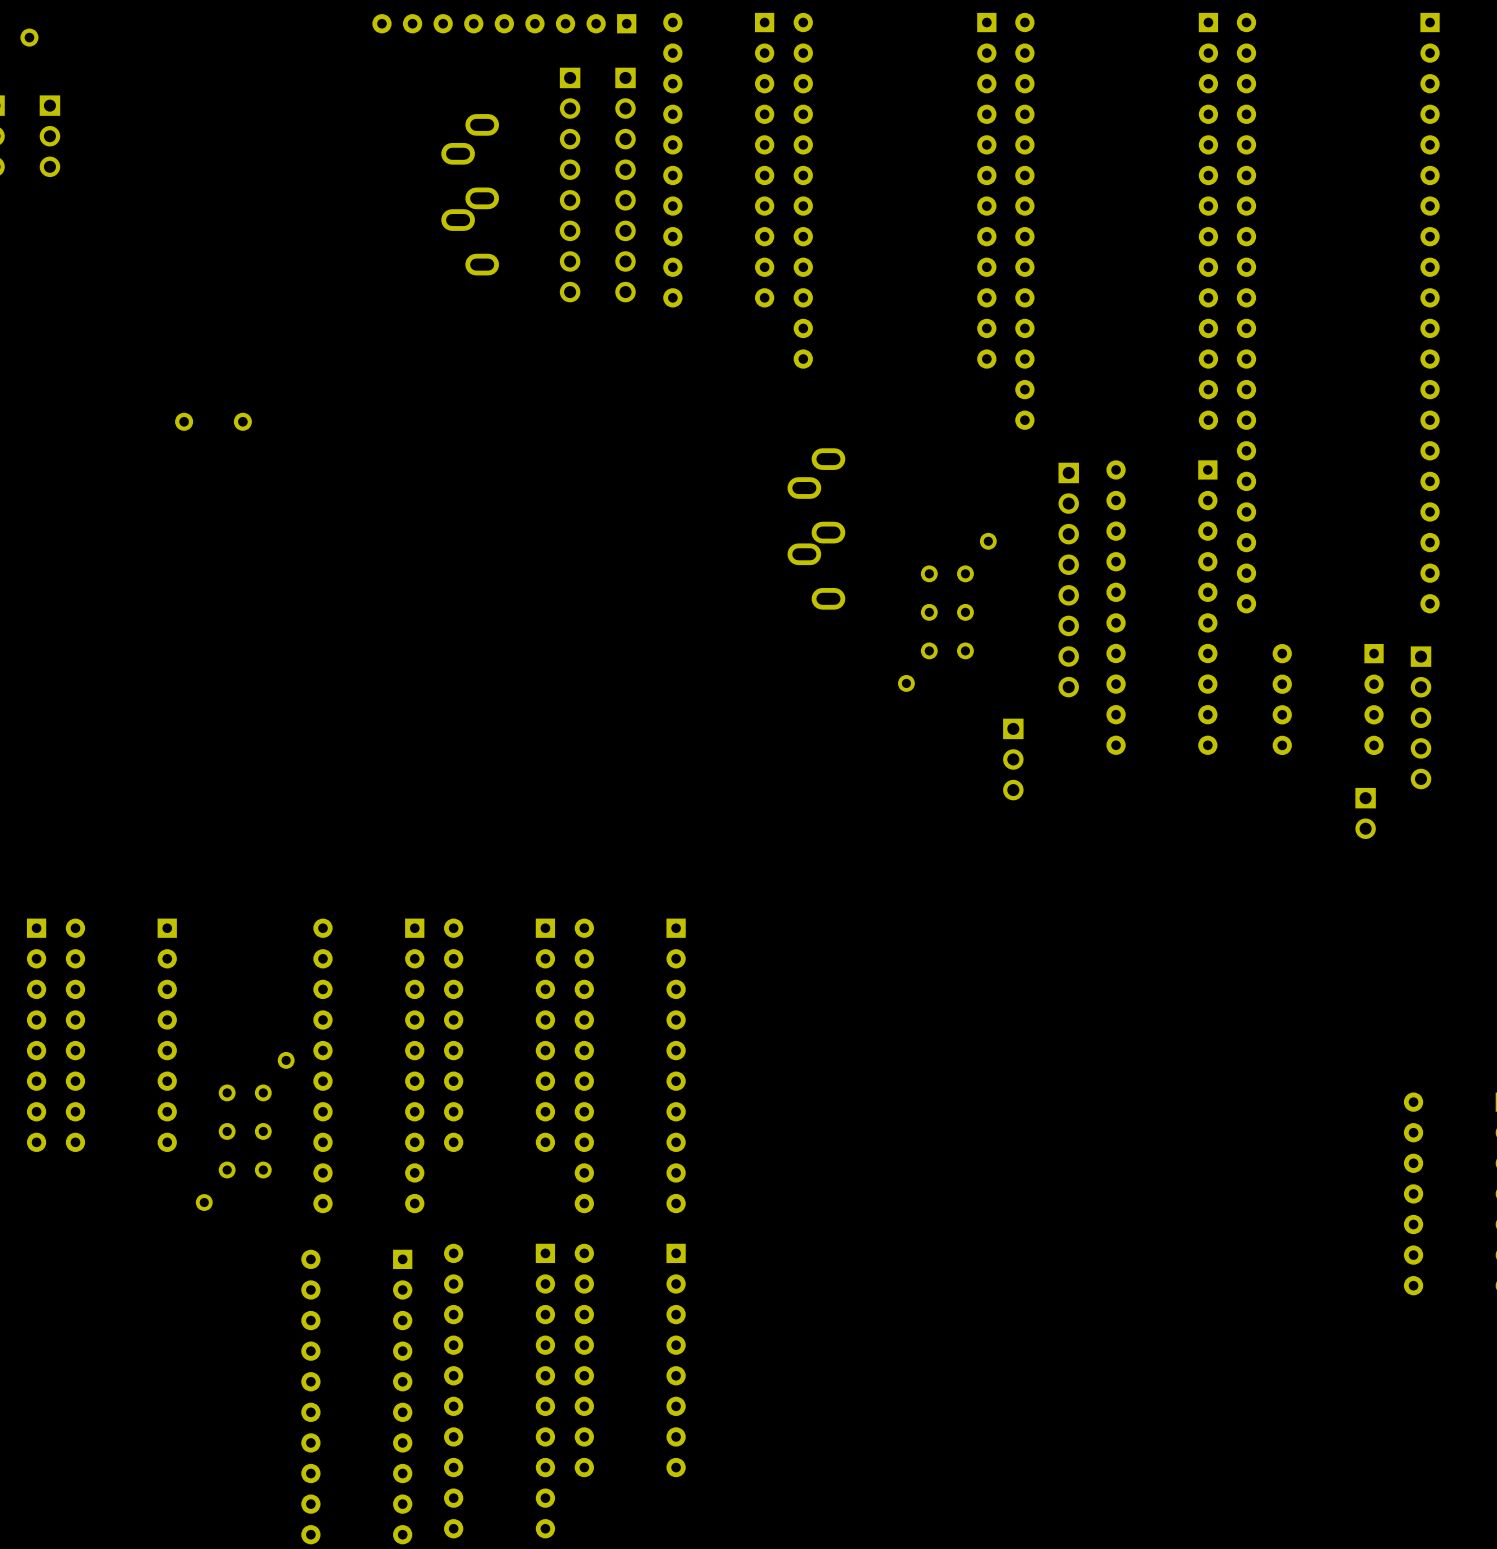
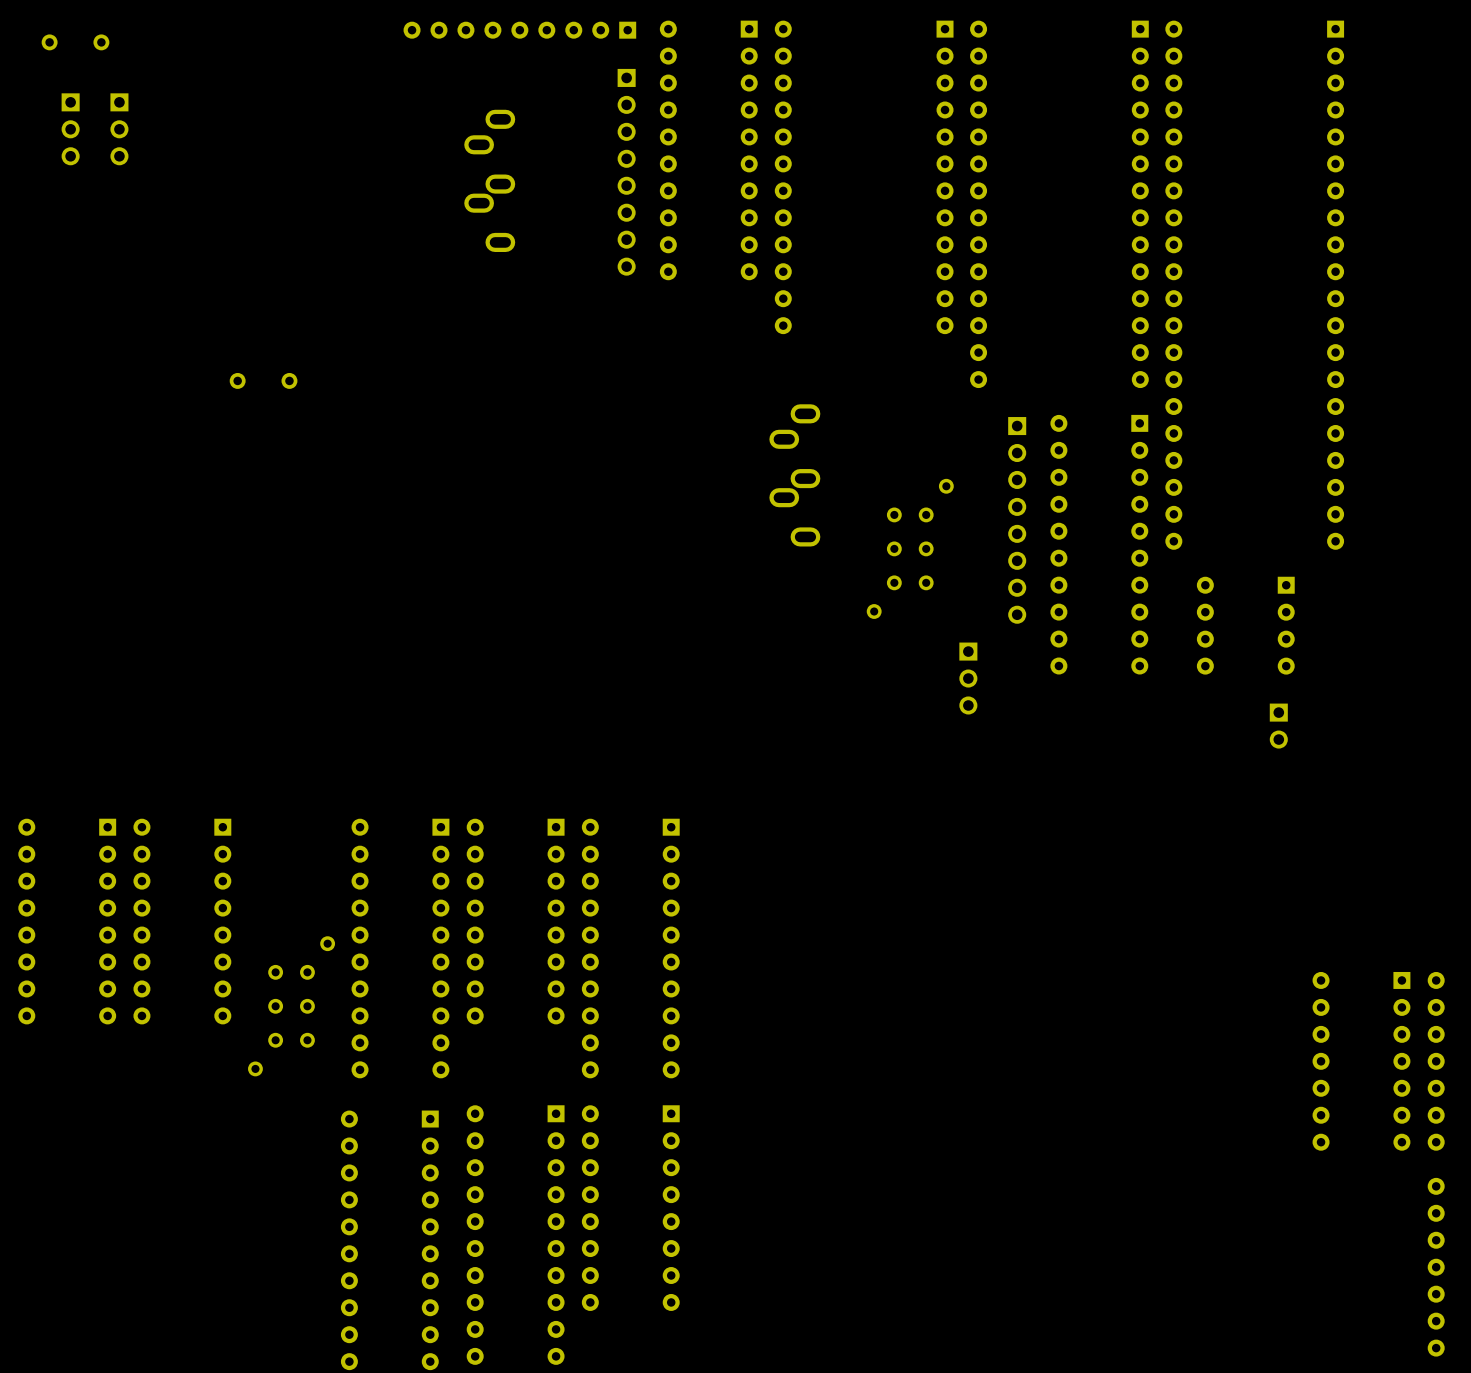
part: (570, 184) -> none
part: (1421, 717) -> none

